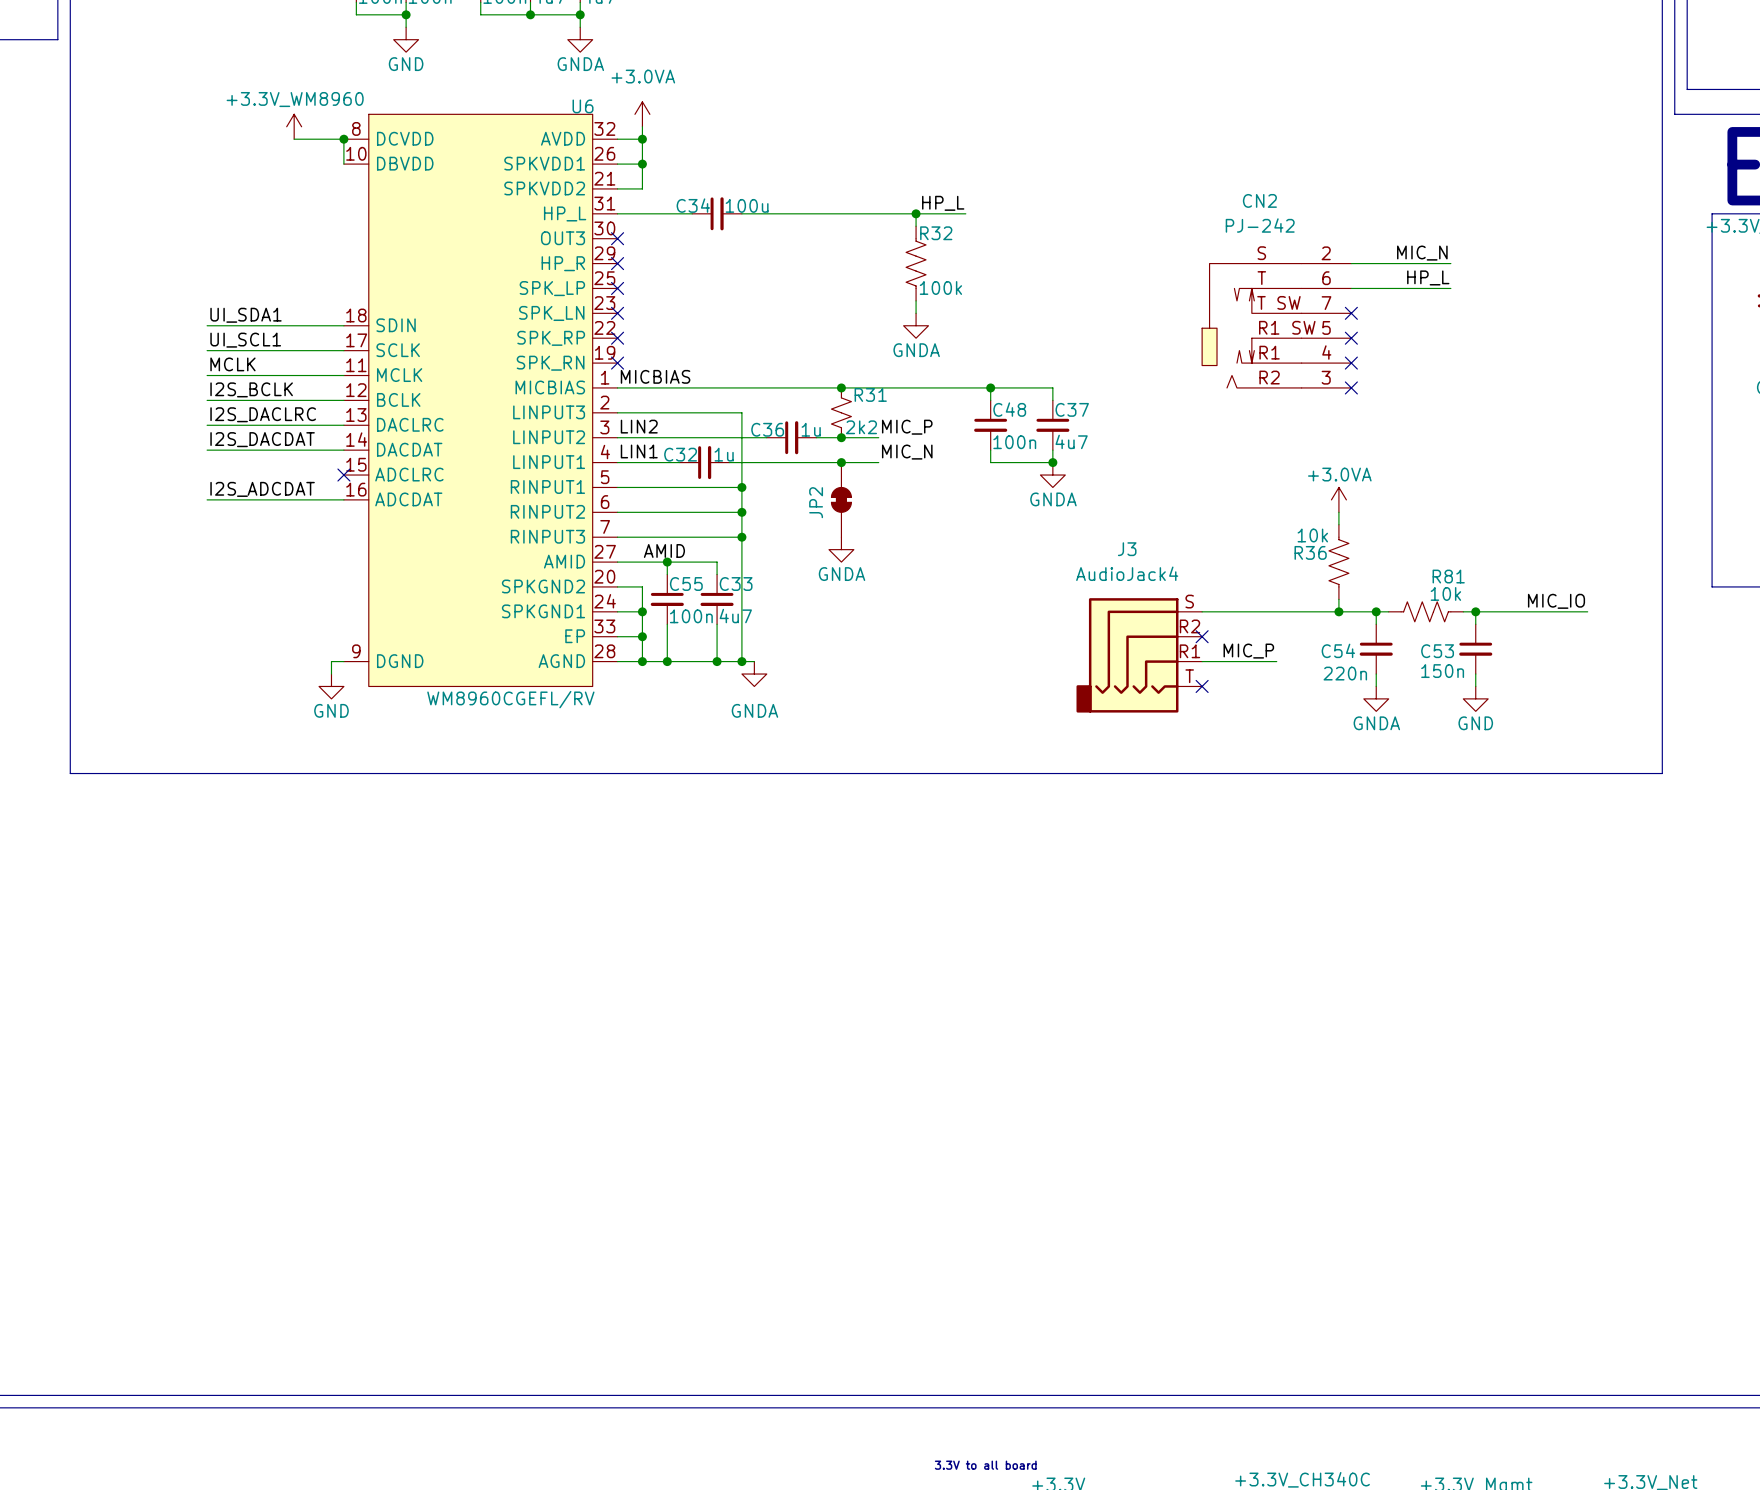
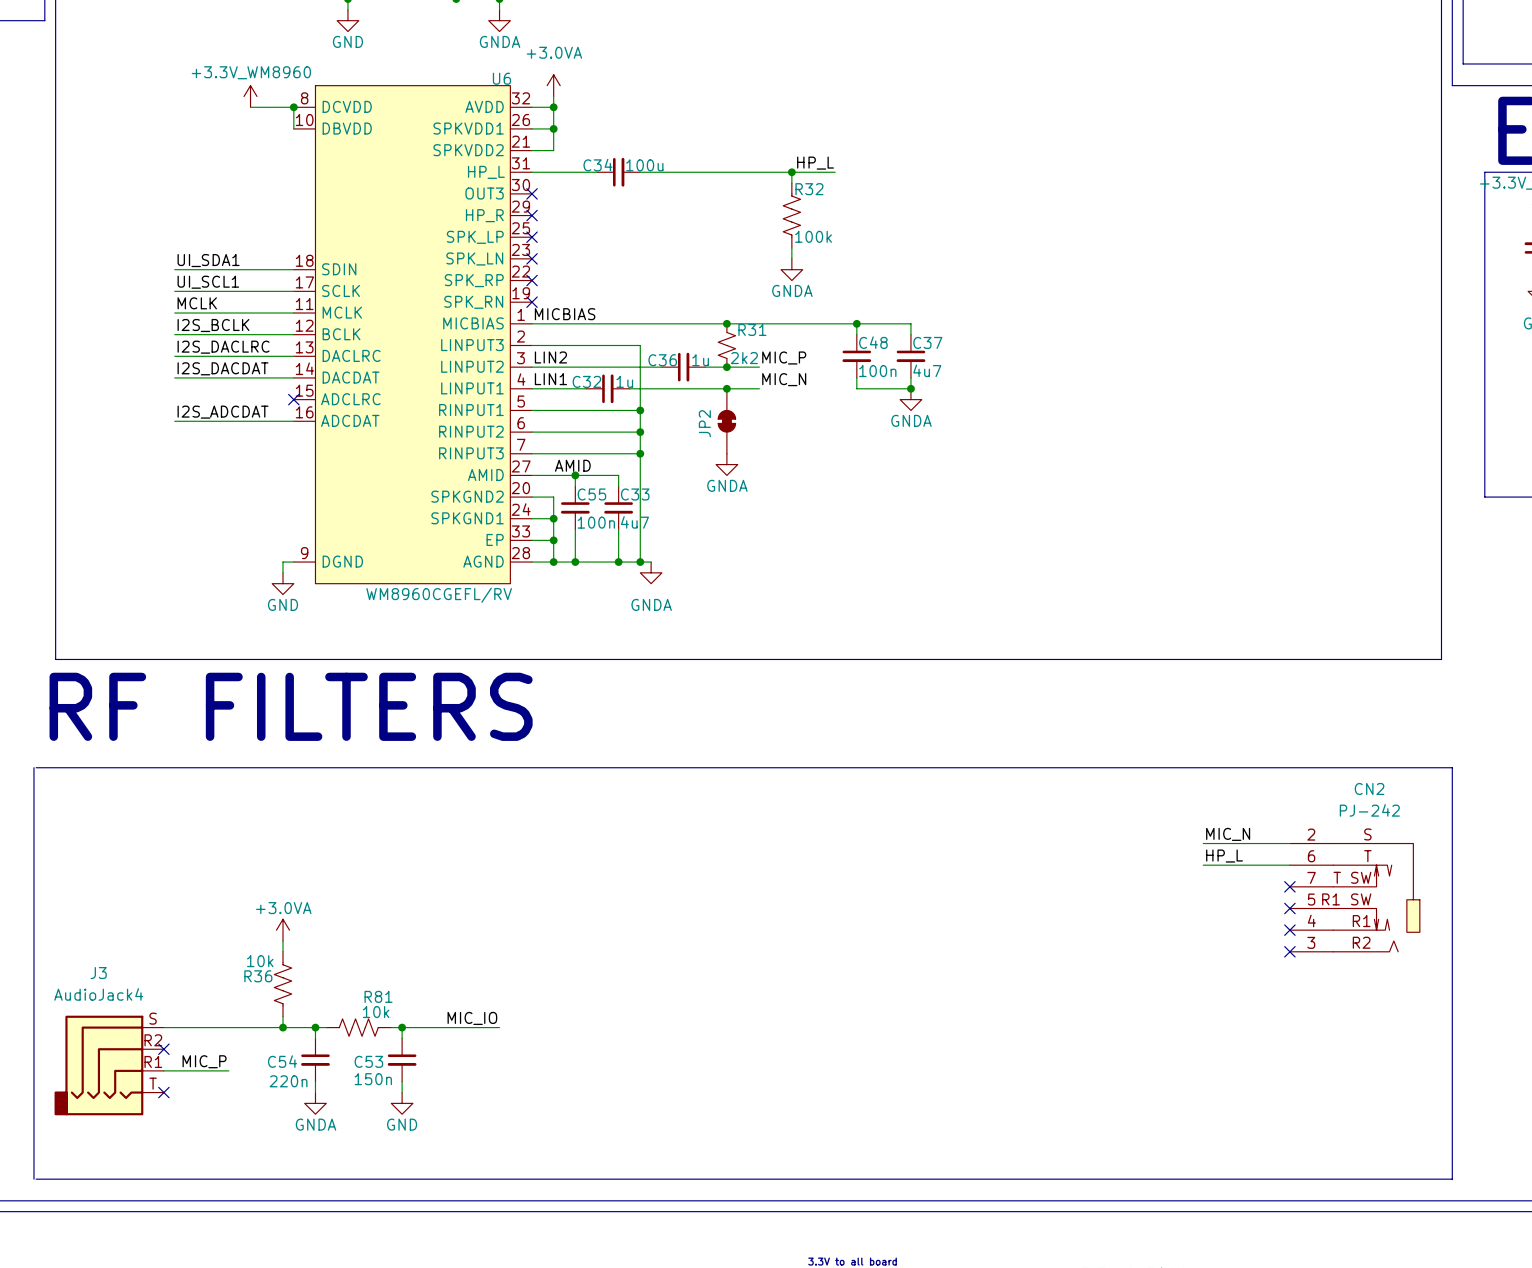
label: MIC_N (1422, 253) -> none
wire: (1351, 263) (1450, 263) -> none
label: HP_L (1428, 277) -> none
wire: (1351, 288) (1450, 288) -> none
no-connect mark: (1351, 313) -> none
CN2 flip: as is (1251, 325) -> left-right (1376, 897)
CN2 position: (1276, 325) -> (1354, 897)
no-connect mark: (1351, 338) -> none
no-connect mark: (1351, 363) -> none
no-connect mark: (1351, 387) -> none
power symbol: +3.0VA (1338, 499) -> none
wire: (1338, 512) (1338, 524) -> none
R36 position: (1338, 562) -> (283, 984)
wire: (1338, 599) (1338, 611) -> none
label: MIC_IO (1556, 601) -> none
wire: (1202, 611) (1388, 611) -> none
junction: (1338, 611) -> none
wire: (1376, 611) (1376, 624) -> none
junction: (1376, 611) -> none
R81 position: (1426, 611) -> (358, 1027)
wire: (1463, 611) (1587, 611) -> none
wire: (1475, 611) (1475, 624) -> none
junction: (1475, 611) -> none
no-connect mark: (1202, 636) -> none
C54 position: (1376, 649) -> (315, 1060)
C53 position: (1475, 649) -> (402, 1060)
label: MIC_P (1248, 651) -> none
J3 position: (1139, 655) -> (109, 1065)
wire: (1202, 661) (1276, 661) -> none
wire: (1376, 674) (1376, 686) -> none
wire: (1475, 674) (1475, 686) -> none
no-connect mark: (1202, 686) -> none
power symbol: GNDA (1376, 698) -> none
power symbol: GND (1475, 698) -> none
text: none -> RF FILTERS (291, 706)
line: none -> (33, 767) (33, 1179)
line: none -> (36, 767) (1452, 767) (1452, 1179) (36, 1179)
label: none -> MIC_N (1228, 834)
wire: none -> (1203, 843) (1289, 843)
label: none -> HP_L (1224, 856)
wire: none -> (1203, 865) (1289, 865)
no-connect mark: none -> (1289, 886)
no-connect mark: none -> (1289, 908)
power symbol: none -> +3.0VA (283, 930)
no-connect mark: none -> (1289, 930)
wire: none -> (283, 940) (283, 951)
no-connect mark: none -> (1289, 951)
wire: none -> (283, 1016) (283, 1027)
label: none -> MIC_IO (472, 1018)
wire: none -> (163, 1027) (326, 1027)
junction: none -> (283, 1027)
wire: none -> (315, 1027) (315, 1038)
junction: none -> (315, 1027)
wire: none -> (391, 1027) (499, 1027)
wire: none -> (402, 1027) (402, 1038)
junction: none -> (402, 1027)
no-connect mark: none -> (163, 1049)
label: none -> MIC_P (204, 1061)
wire: none -> (163, 1070) (228, 1070)
wire: none -> (315, 1081) (315, 1092)
wire: none -> (402, 1081) (402, 1092)
no-connect mark: none -> (163, 1092)
power symbol: none -> GNDA (315, 1103)
power symbol: none -> GND (402, 1103)

